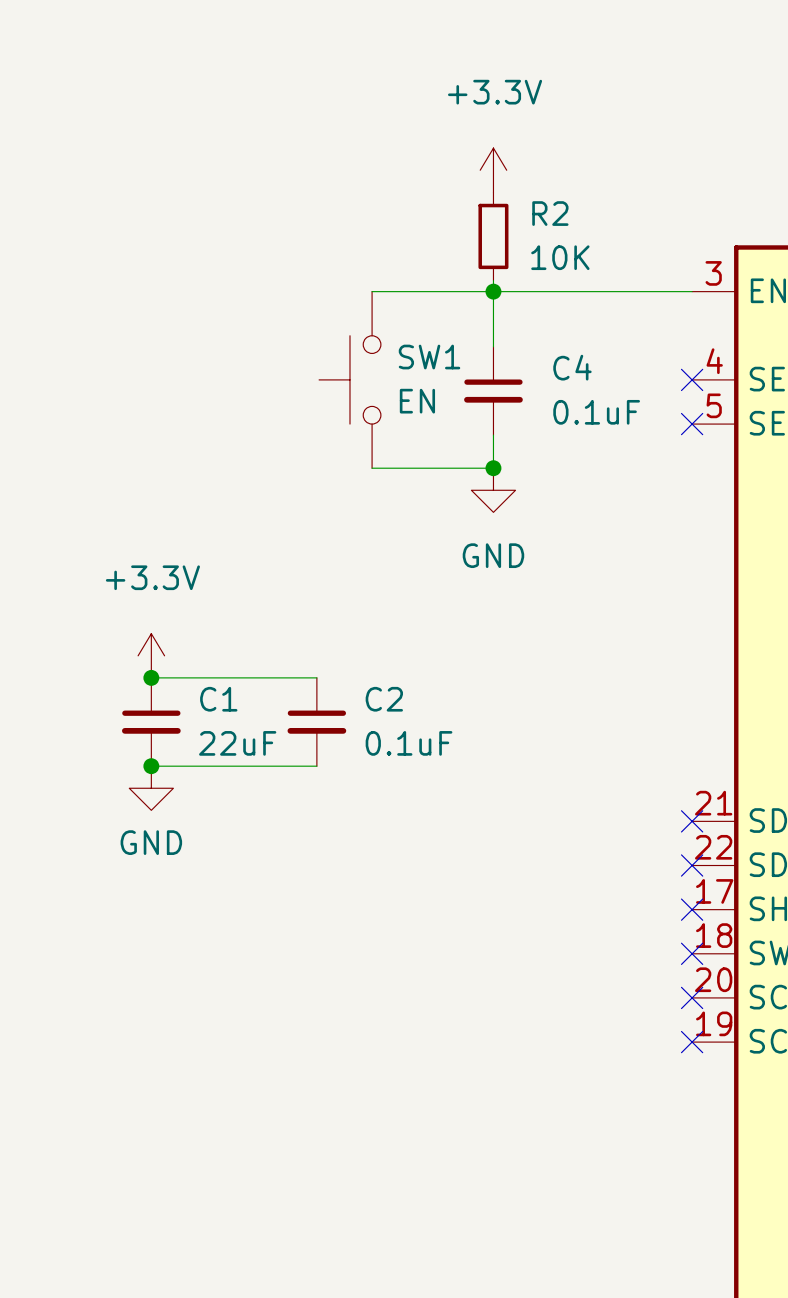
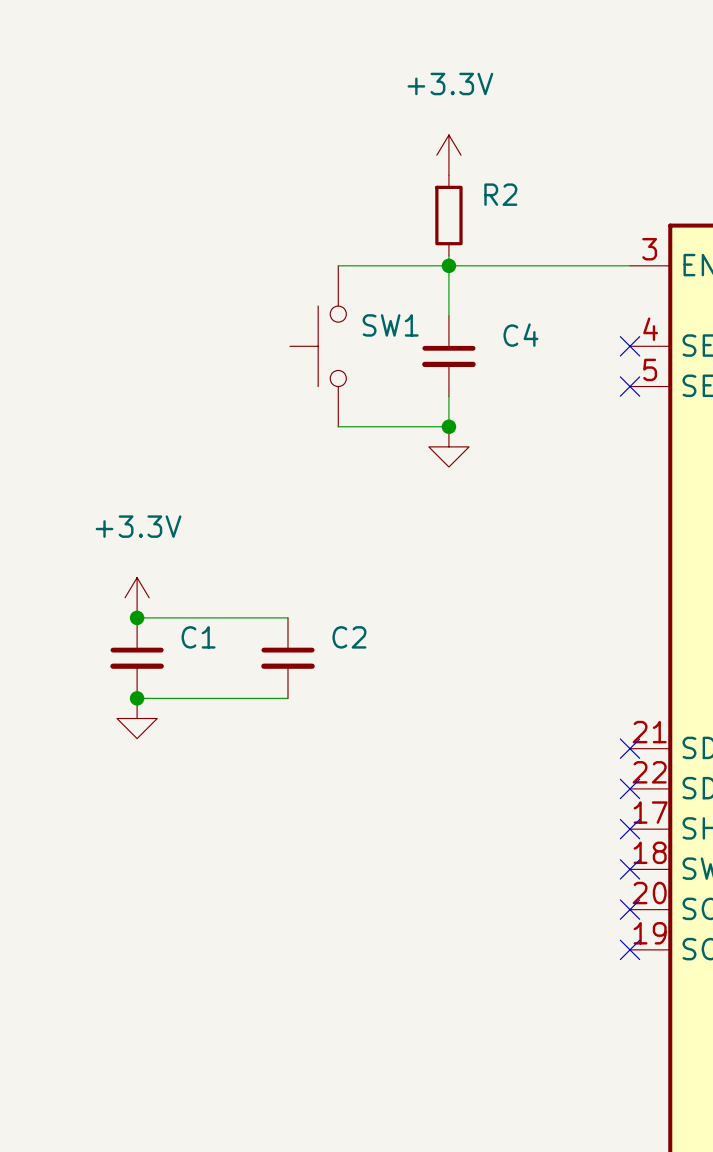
R2 value: 10K (560, 257) -> none
SW1 value: EN (417, 401) -> none
C4 value: 0.1uF (596, 412) -> none
power symbol text: GND (493, 555) -> none
C1 value: 22uF (237, 743) -> none
C2 value: 0.1uF (409, 743) -> none
power symbol text: GND (151, 842) -> none

